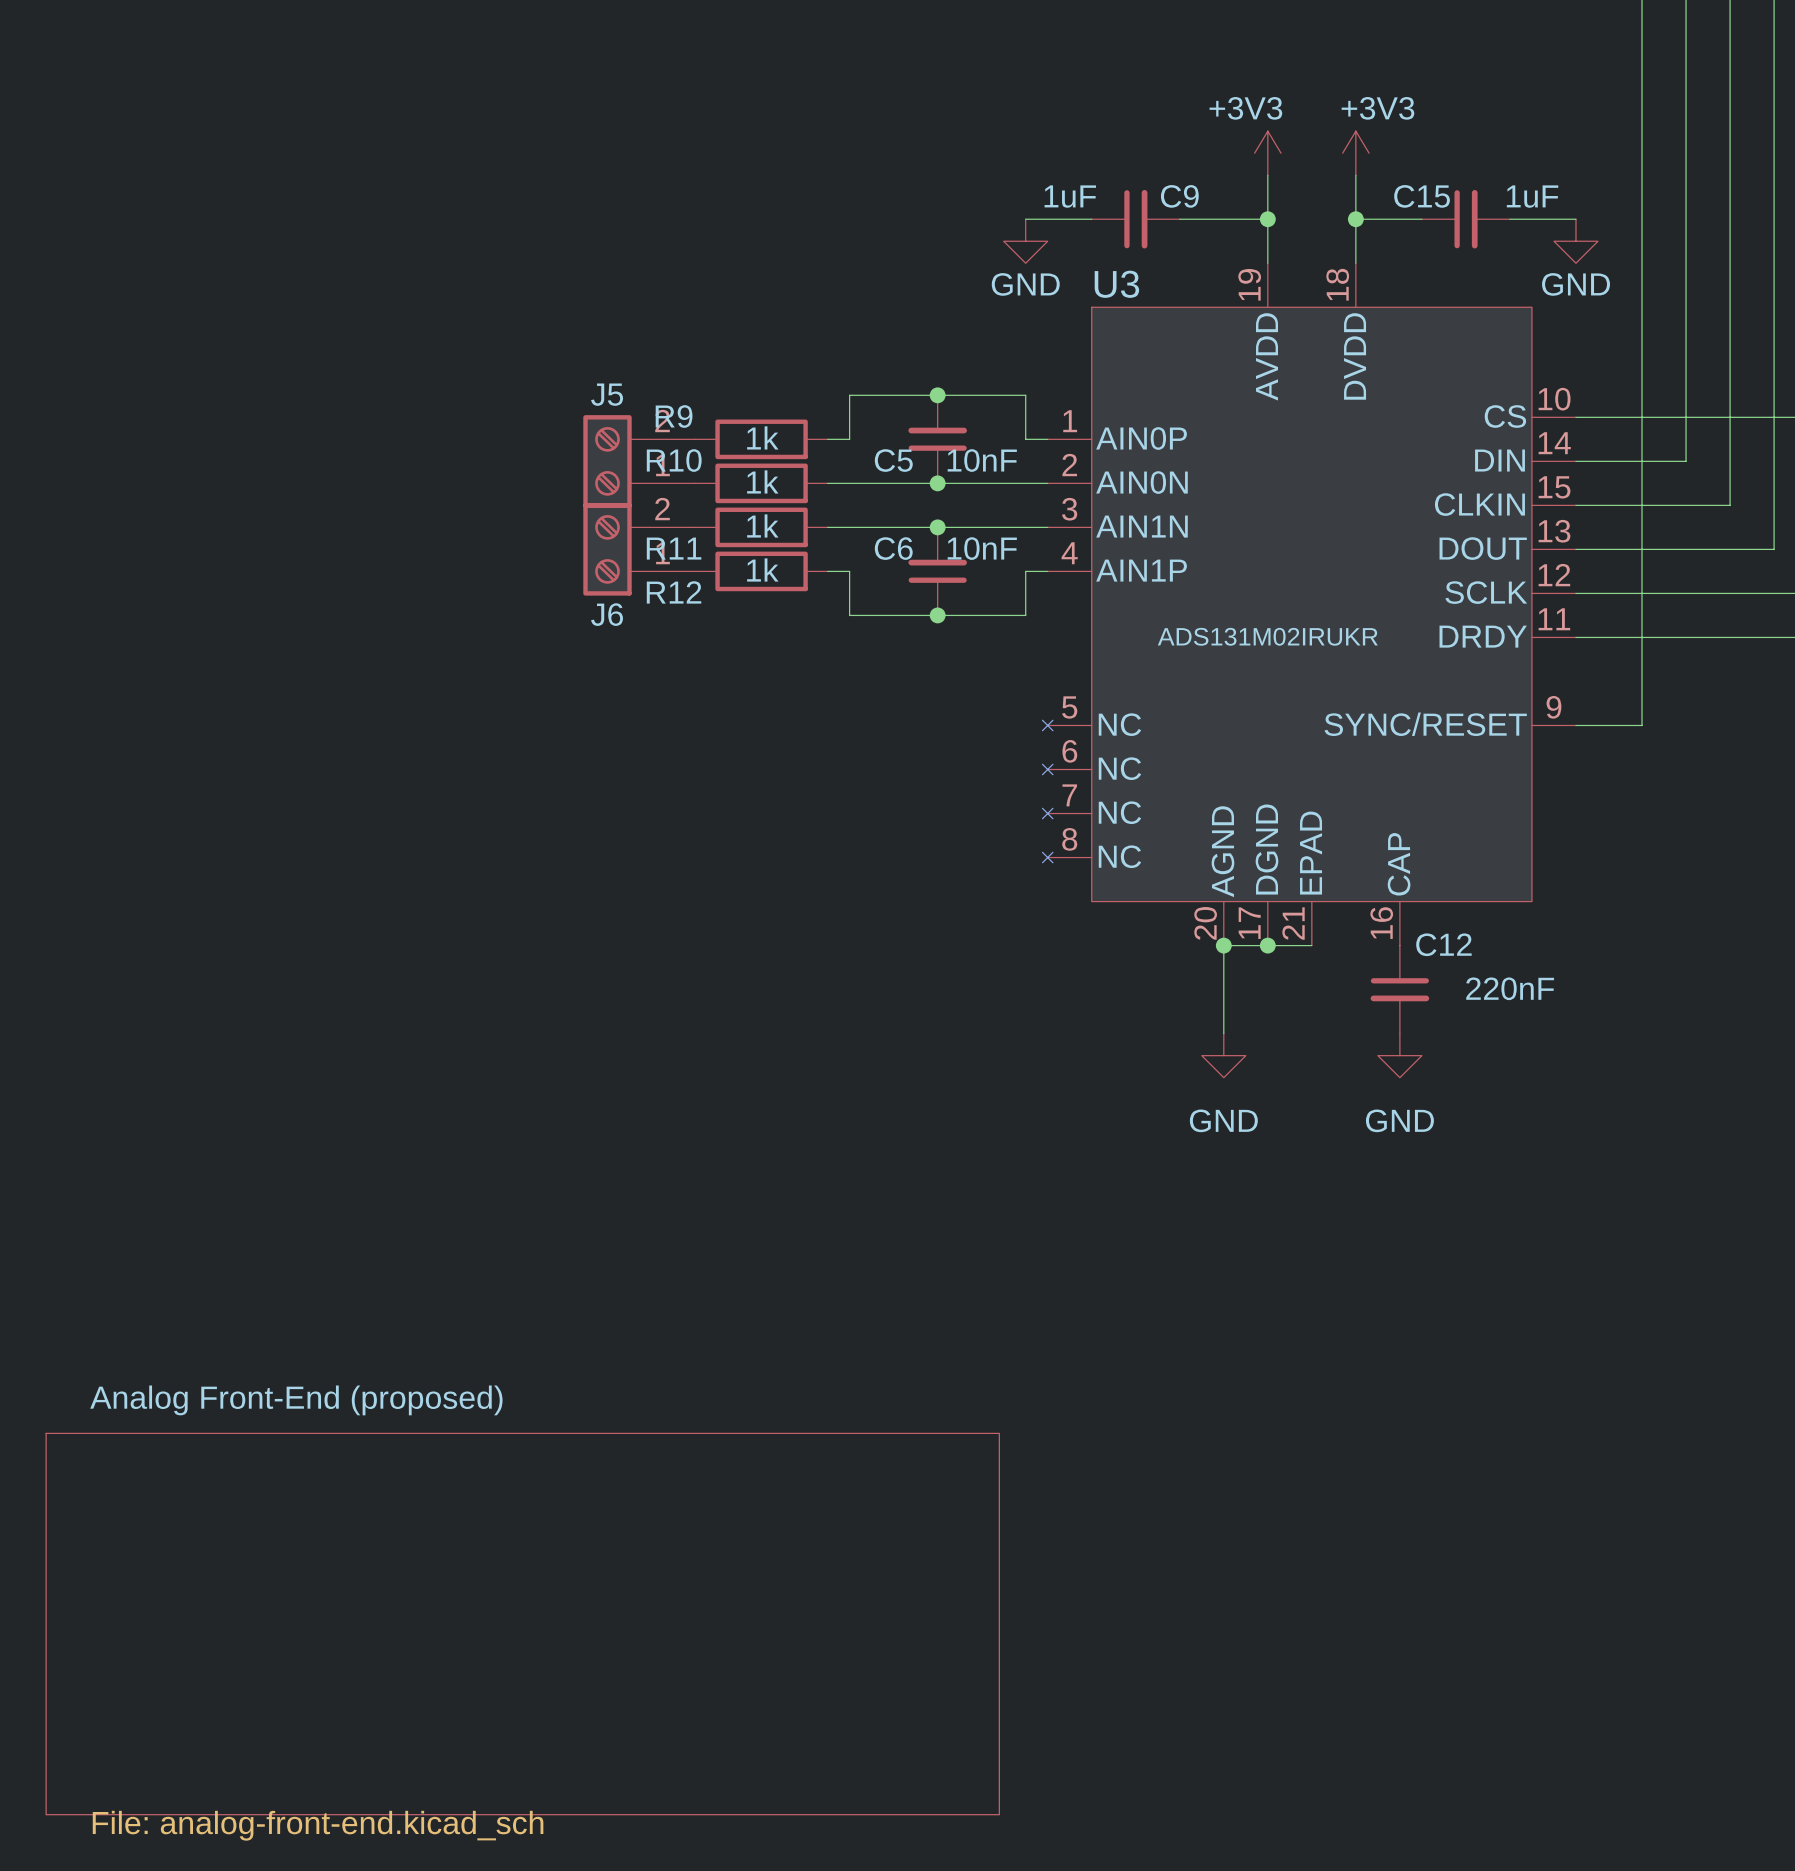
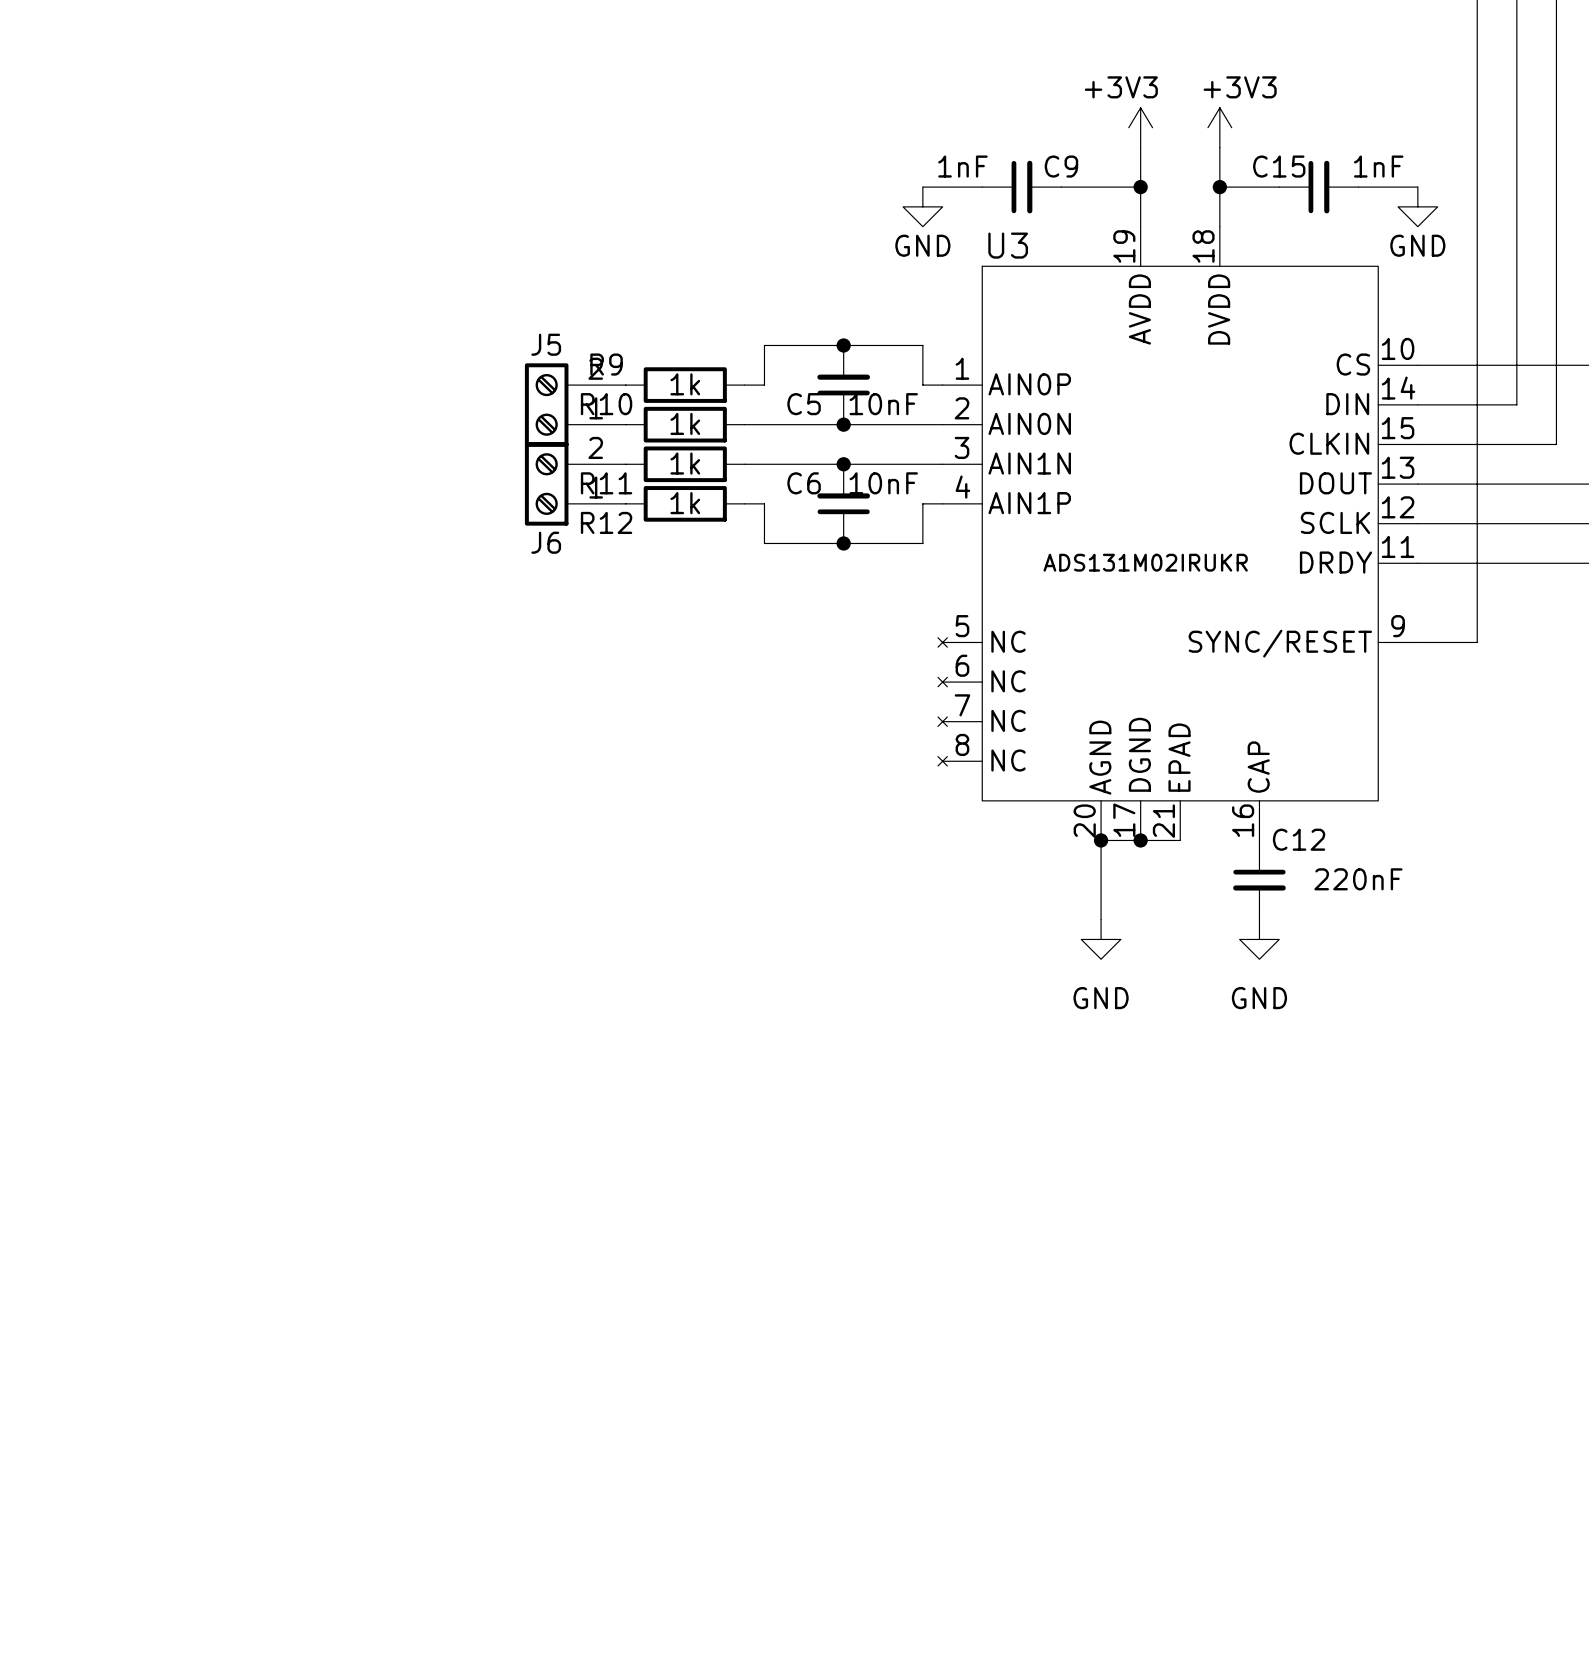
C9 value: 1uF (1070, 196) -> 1nF (962, 166)
C15 value: 1uF (1532, 196) -> 1nF (1378, 166)
sheet Analog Front-End (proposed): File: analog-front-end.kicad_sch (522, 1624) -> none

